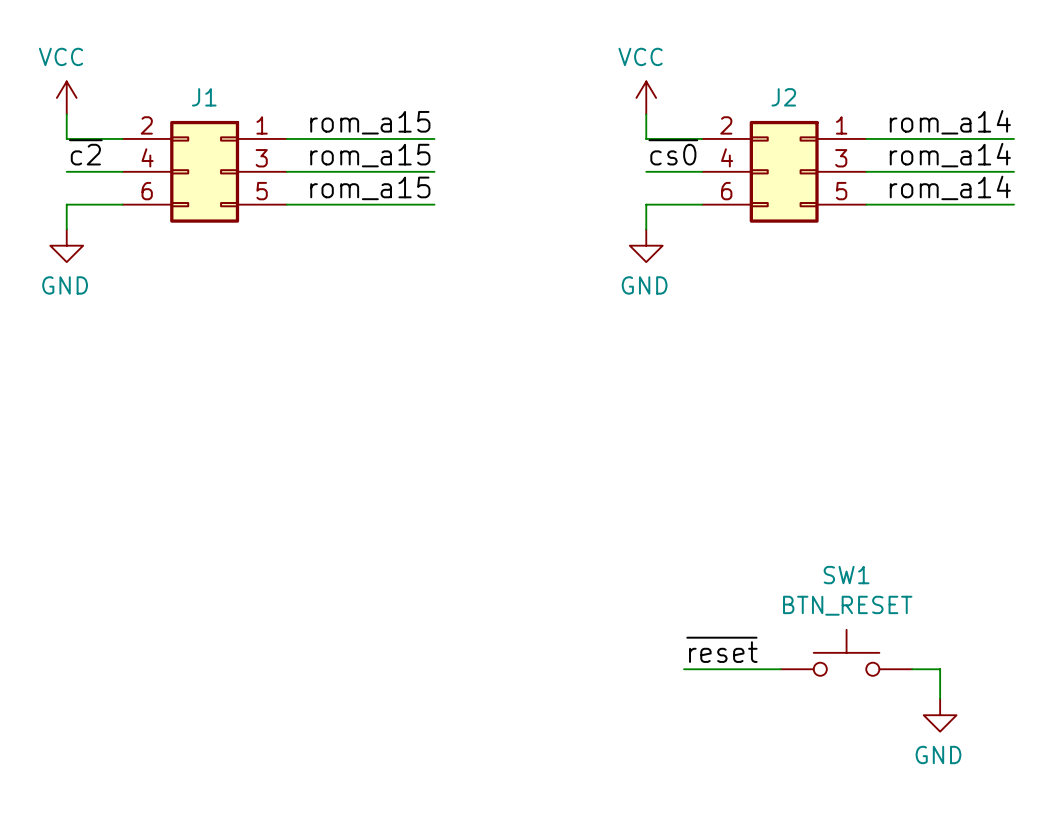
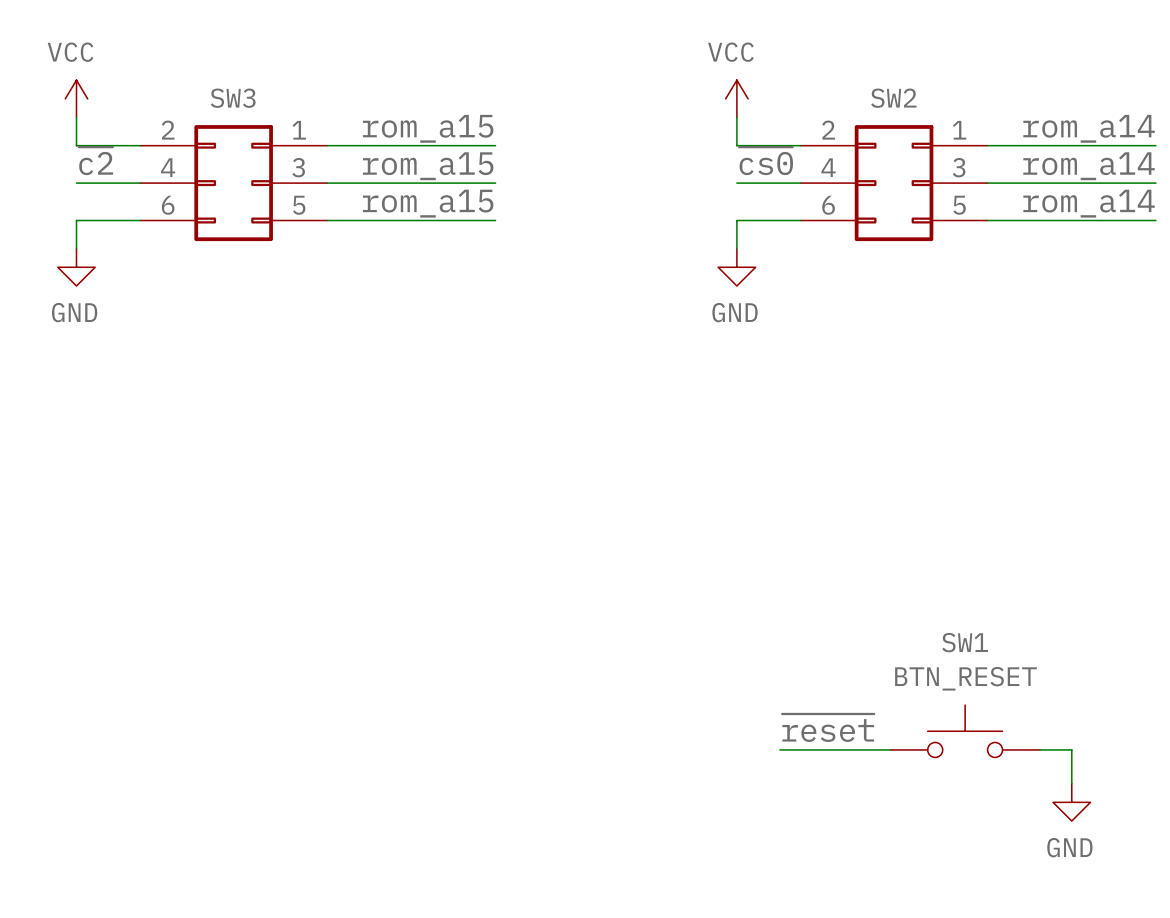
J1 name: J1 (204, 97) -> SW3 (233, 98)
J2 name: J2 (783, 97) -> SW2 (893, 98)

